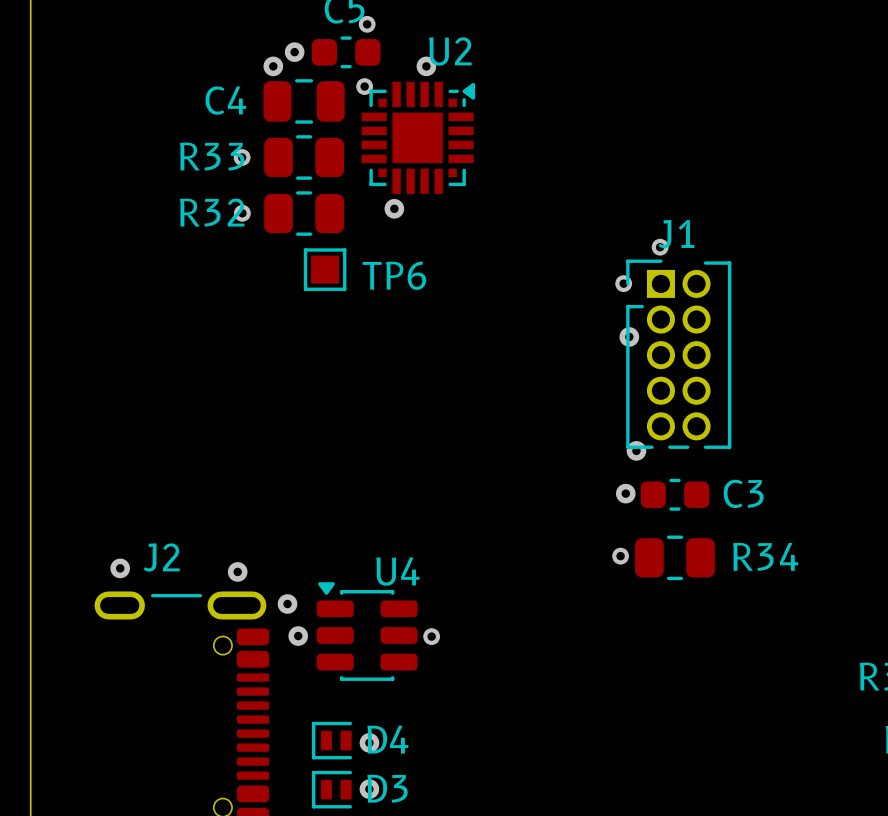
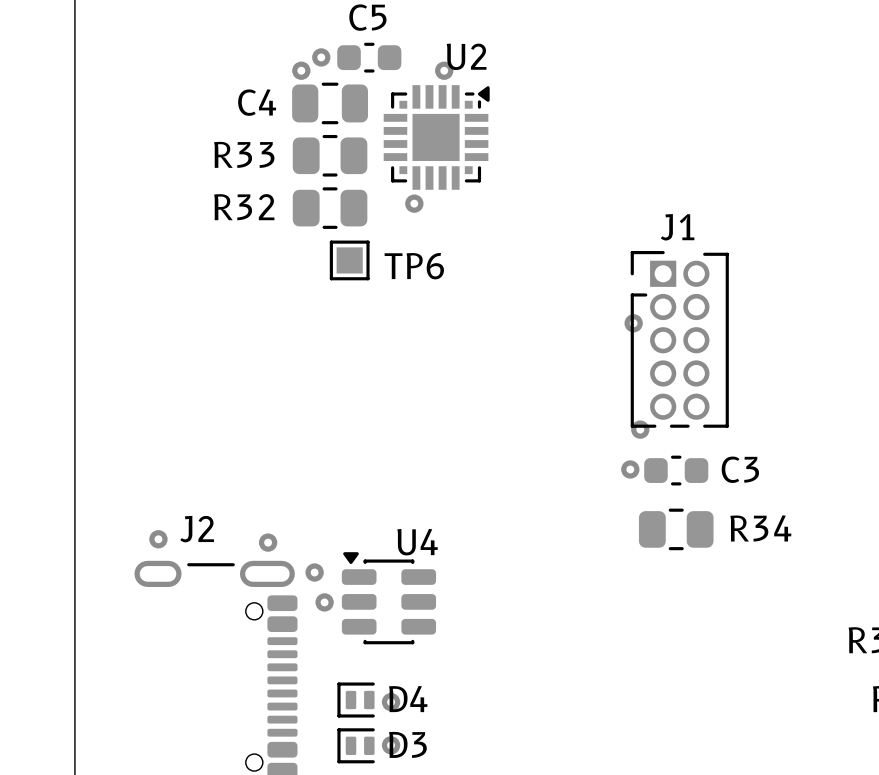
via: (367, 24) -> none
via: (364, 86) -> none
via: (242, 157) -> none
via: (242, 213) -> none
via: (660, 247) -> none
via: (623, 283) -> none
via: (620, 556) -> none
via: (431, 636) -> none

